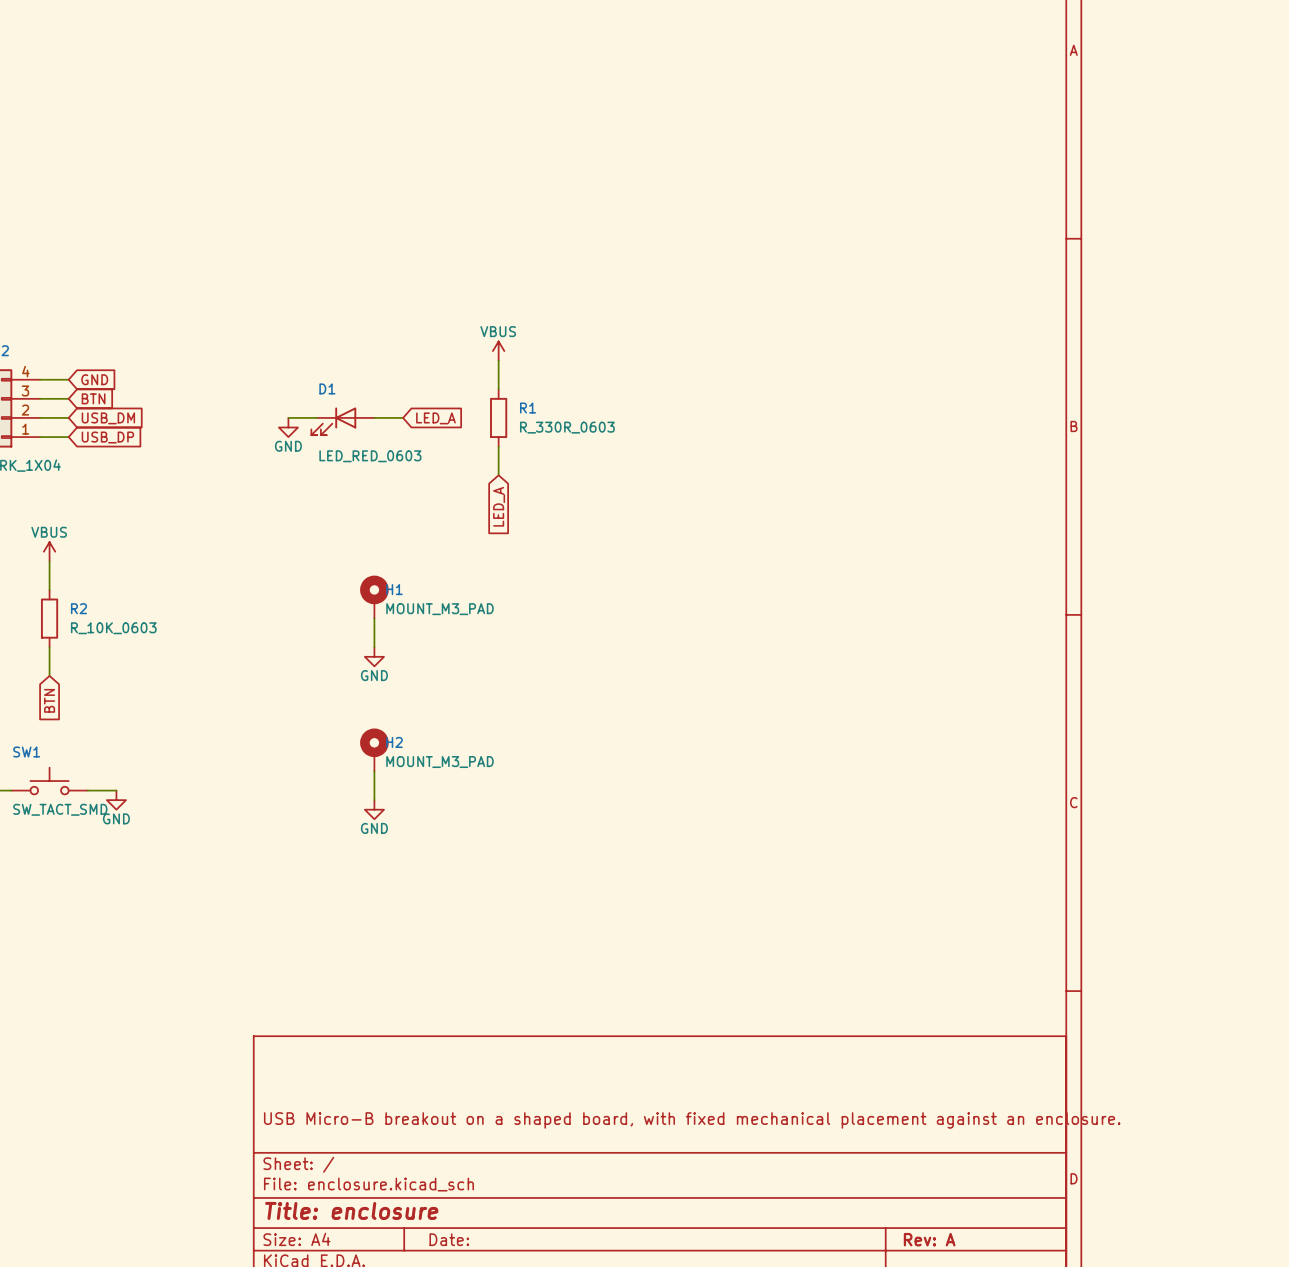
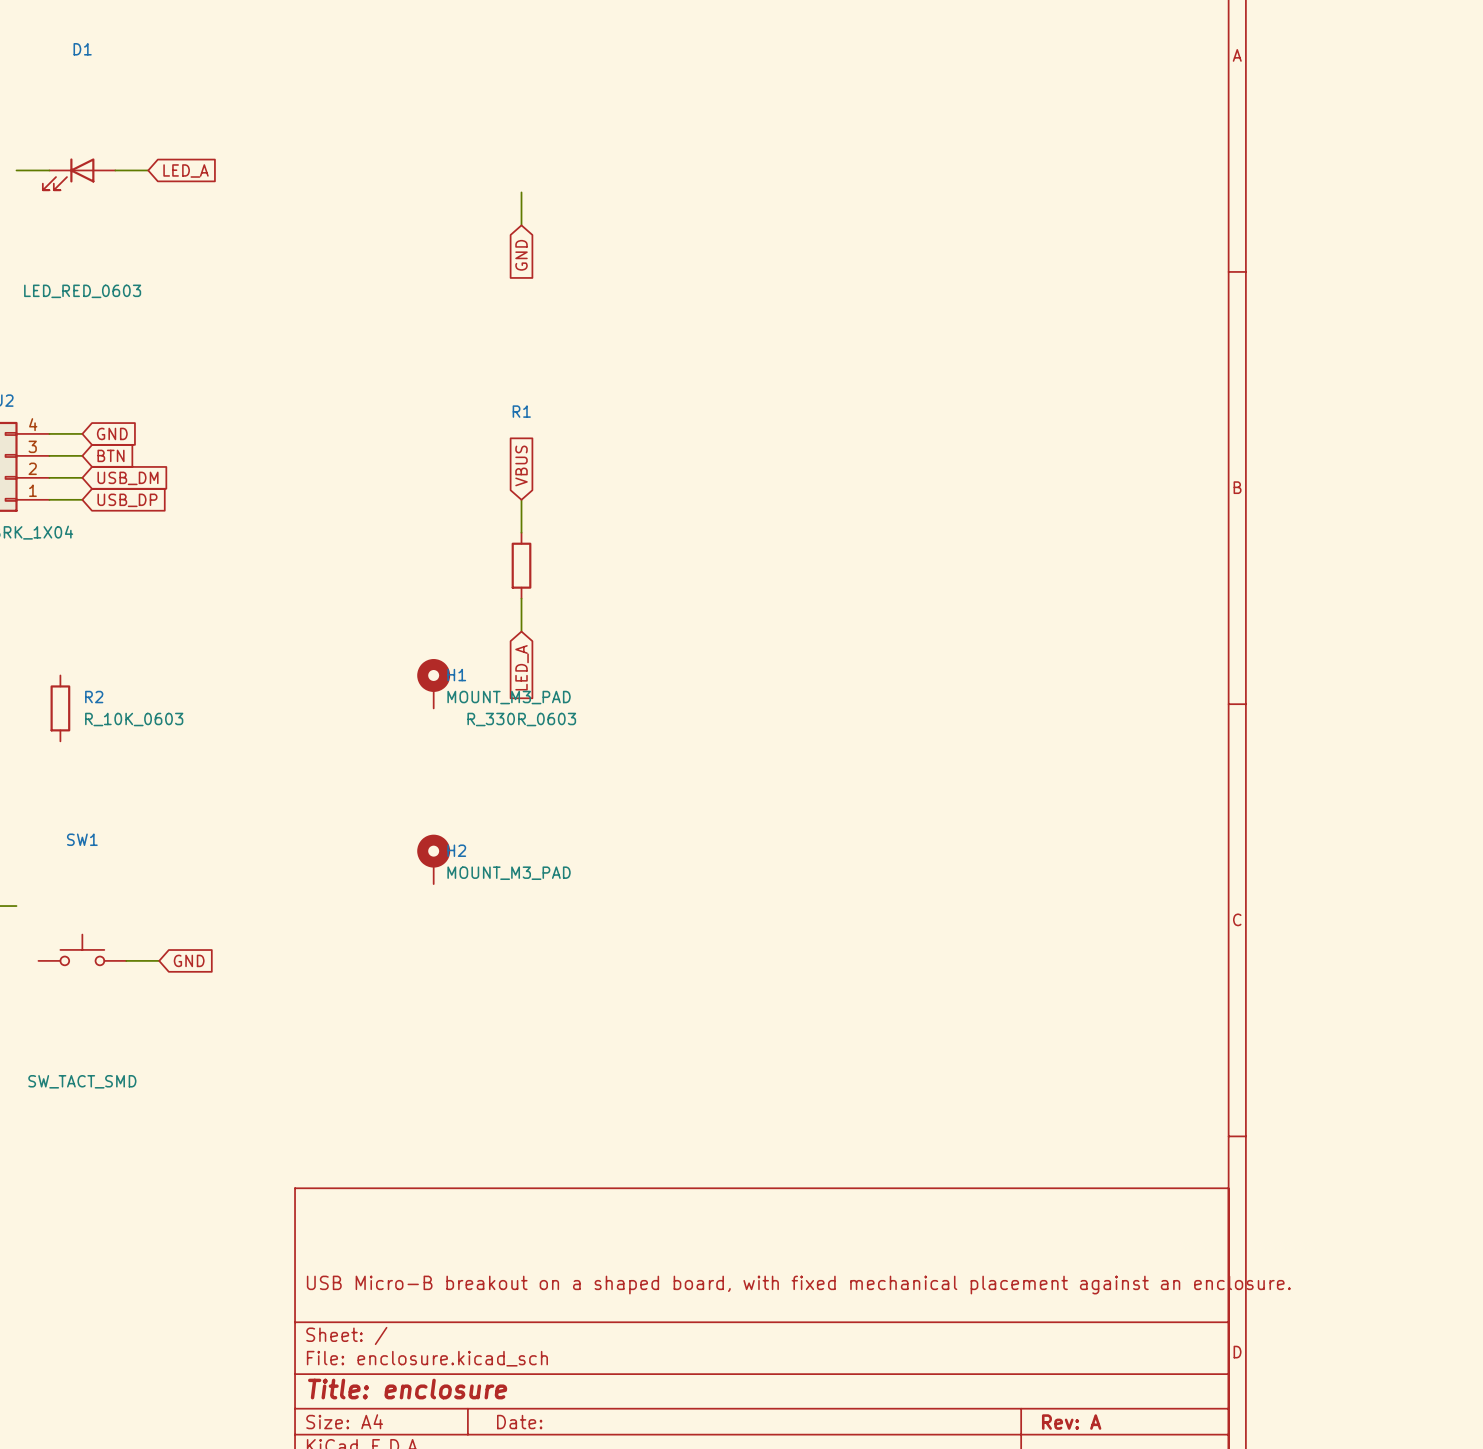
wire: none -> (16, 170) (49, 170)
wire: none -> (115, 170) (148, 170)
global label: none -> LED_A (186, 170)
wire: none -> (521, 192) (521, 225)
global label: none -> GND (521, 255)
power symbol: VBUS (498, 351) -> none
wire: (498, 360) (498, 389) -> (521, 499) (521, 532)
D1 name position: D1 (327, 388) -> D1 (82, 49)
global label: none -> VBUS (521, 465)
R1 name position: R1 (528, 408) -> R1 (521, 411)
wire: (288, 417) (317, 417) -> none
wire: (374, 417) (403, 417) -> none
R1 position: (498, 417) -> (521, 565)
global label: LED_A (435, 418) -> none
D1 position: (342, 421) -> (79, 174)
power symbol: GND (288, 427) -> none
R1 value position: R_330R_0603 (567, 427) -> R_330R_0603 (521, 719)
wire: (498, 446) (498, 475) -> (521, 598) (521, 631)
D1 value position: LED_RED_0603 (370, 456) -> LED_RED_0603 (82, 291)
global label: LED_A (499, 506) -> none
power symbol: VBUS (49, 551) -> none
wire: (49, 561) (49, 589) -> none
global label: none -> LED_A (522, 667)
wire: (374, 618) (374, 647) -> none
wire: (49, 647) (49, 675) -> none
power symbol: GND (374, 656) -> none
global label: BTN (49, 700) -> none
SW1 name position: SW1 (26, 752) -> SW1 (82, 839)
wire: (374, 771) (374, 800) -> none
SW1 position: (49, 781) -> (82, 949)
wire: (87, 790) (116, 790) -> (126, 960) (159, 960)
power symbol: GND (116, 800) -> none
SW1 value position: SW_TACT_SMD (60, 809) -> SW_TACT_SMD (82, 1081)
power symbol: GND (374, 809) -> none
global label: none -> GND (189, 960)

